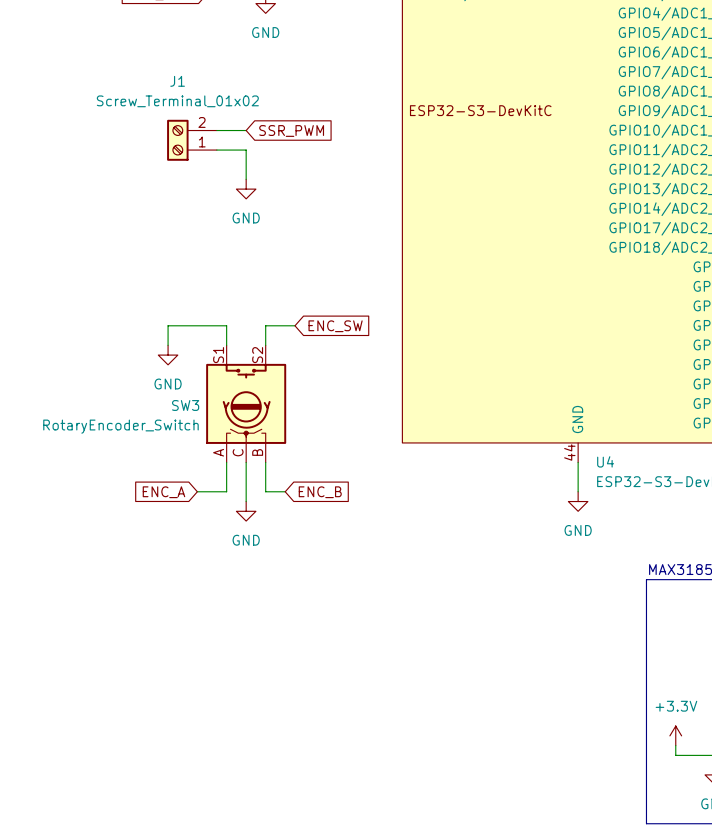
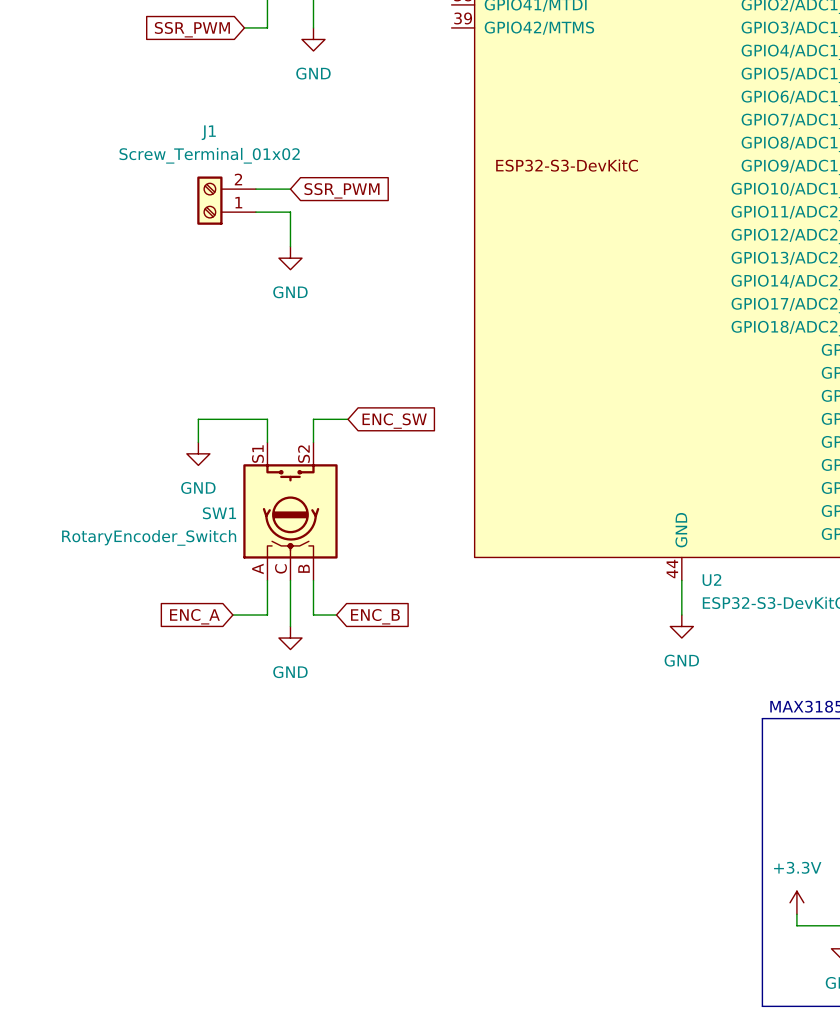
SW3 name: SW3 (185, 405) -> SW1 (219, 513)
U4 name: U4 (605, 461) -> U2 (711, 580)

